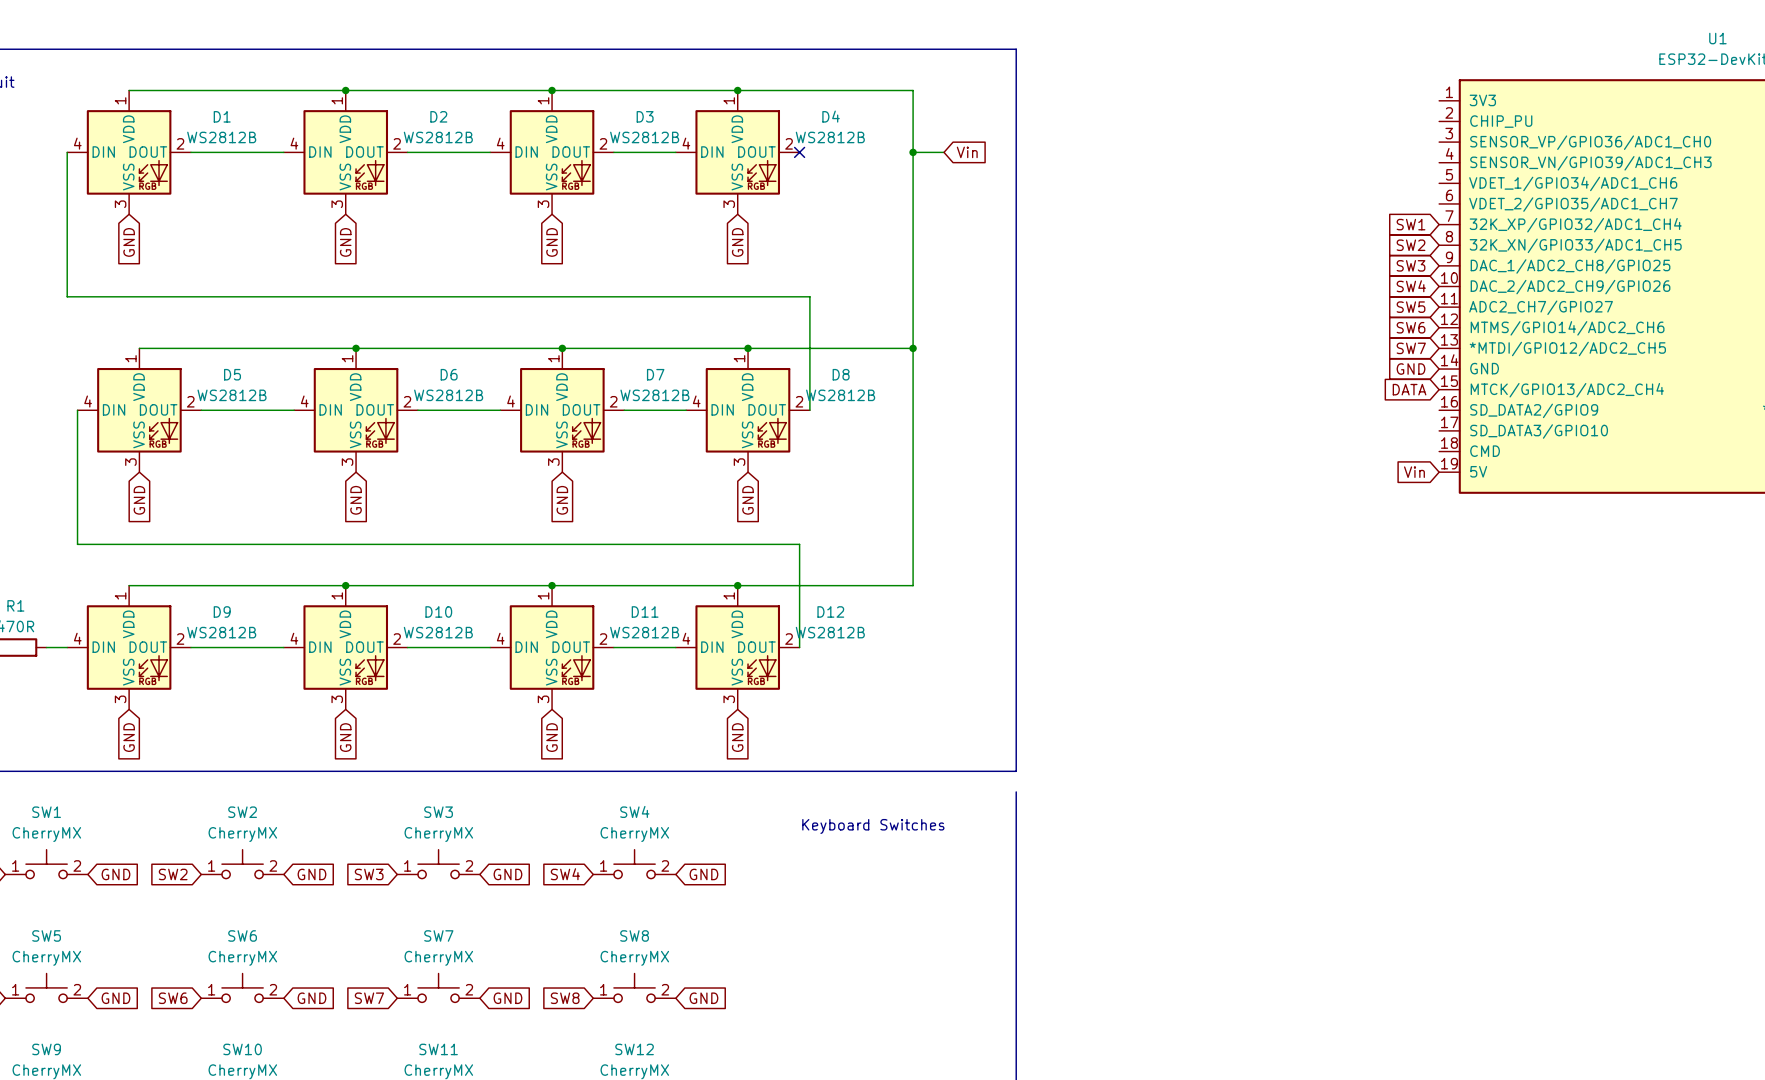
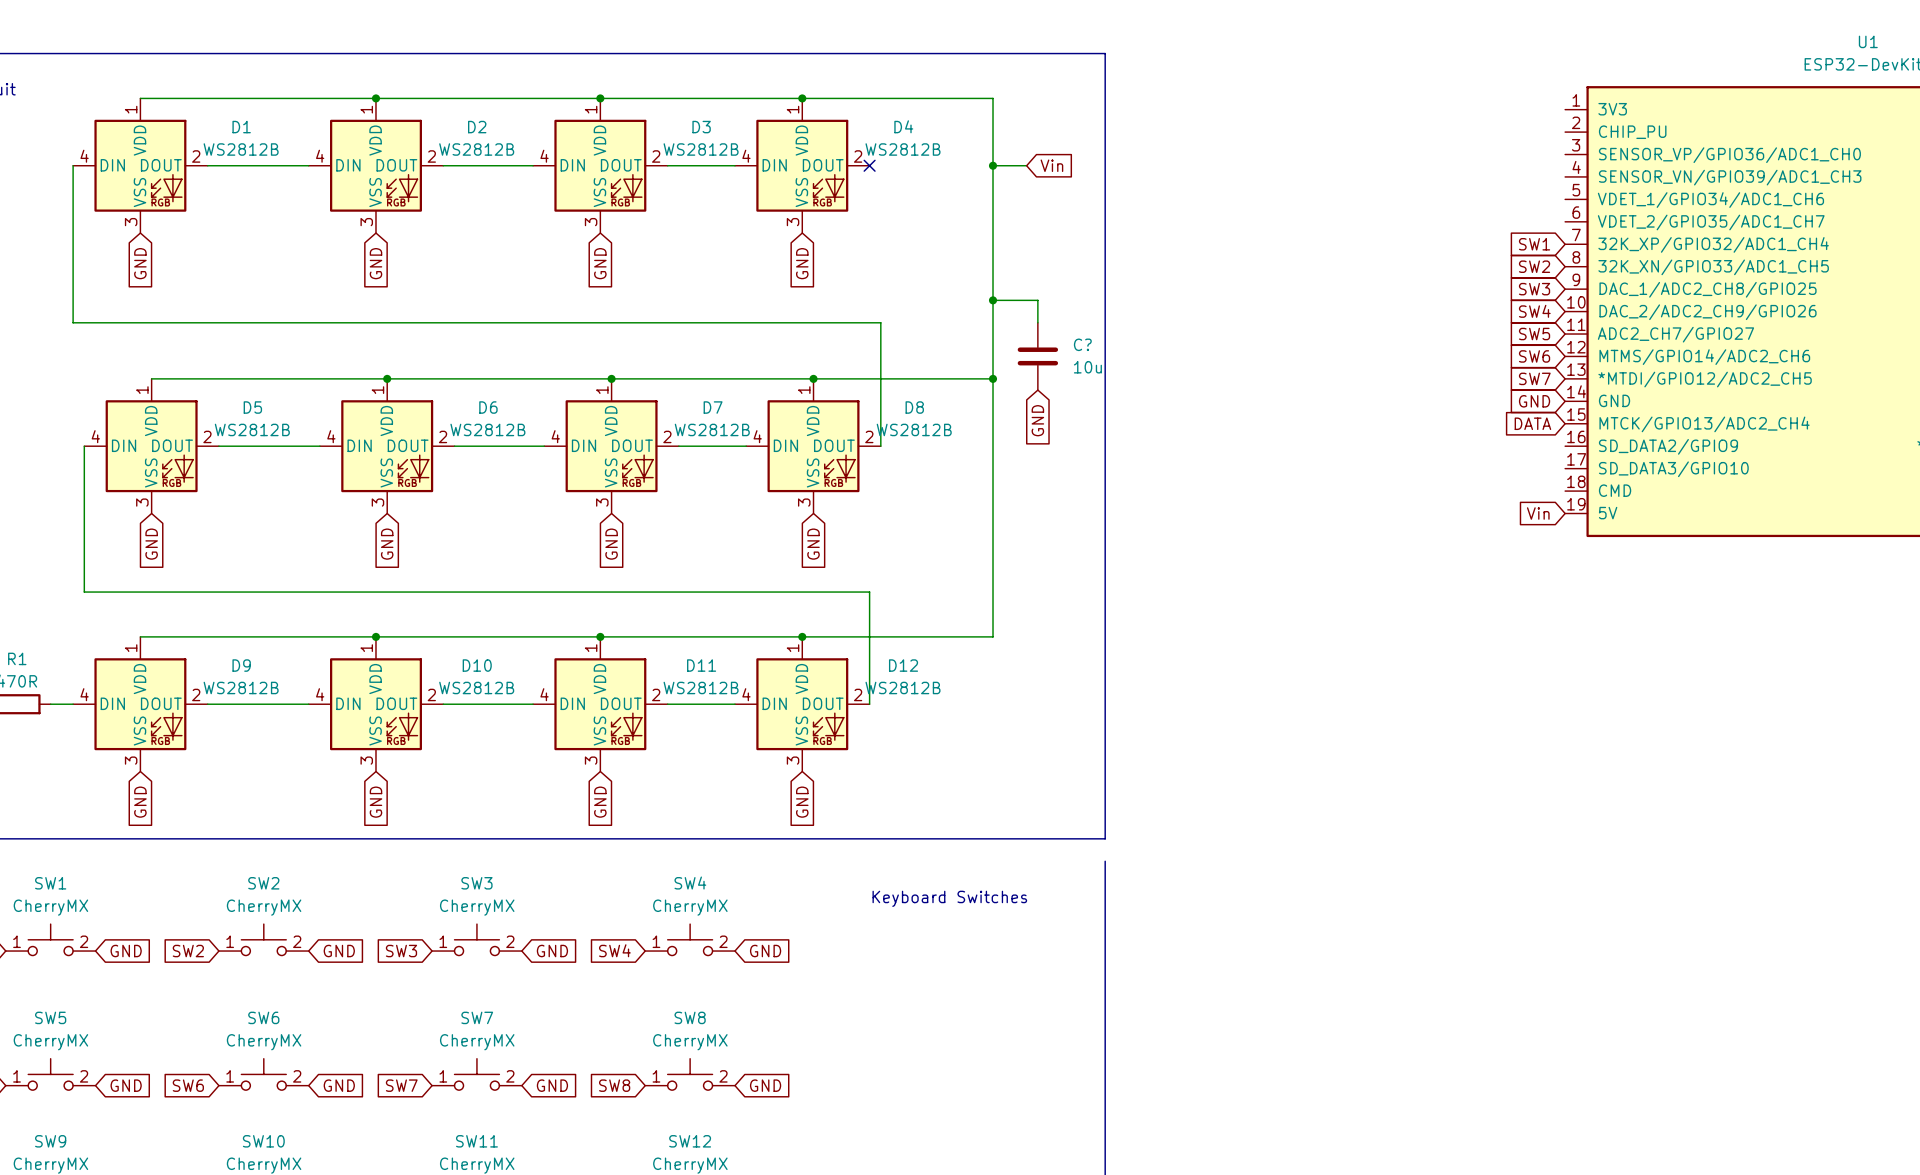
wire: none -> (993, 300) (1037, 300) (1037, 322)
junction: none -> (993, 300)
C?: none -> 10u (1037, 356)
global label: none -> GND (1037, 420)

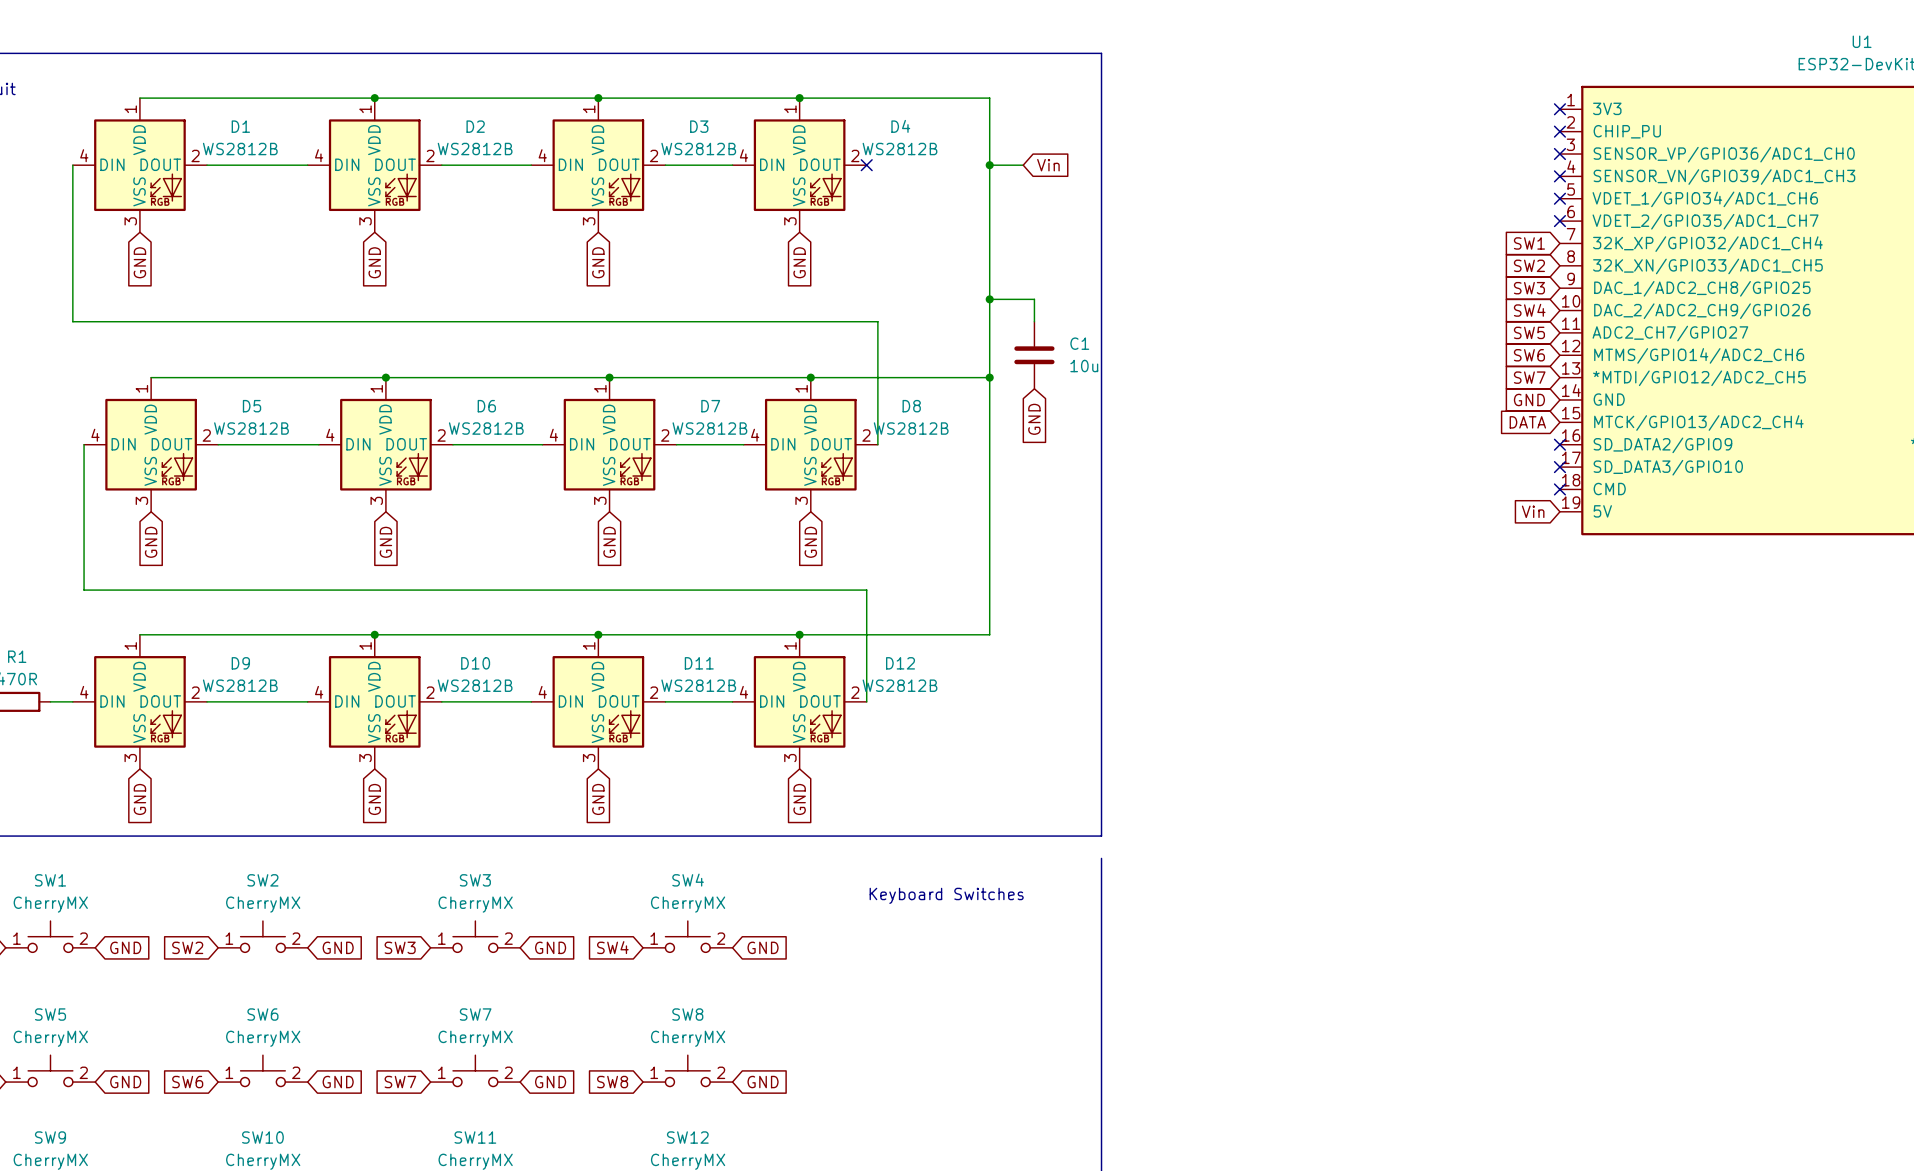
no-connect mark: none -> (1559, 109)
no-connect mark: none -> (1559, 131)
no-connect mark: none -> (1559, 154)
no-connect mark: none -> (1559, 176)
no-connect mark: none -> (1559, 198)
no-connect mark: none -> (1559, 221)
C? name: C? (1082, 344) -> C1 (1079, 343)
no-connect mark: none -> (1559, 444)
no-connect mark: none -> (1559, 467)
no-connect mark: none -> (1559, 489)

